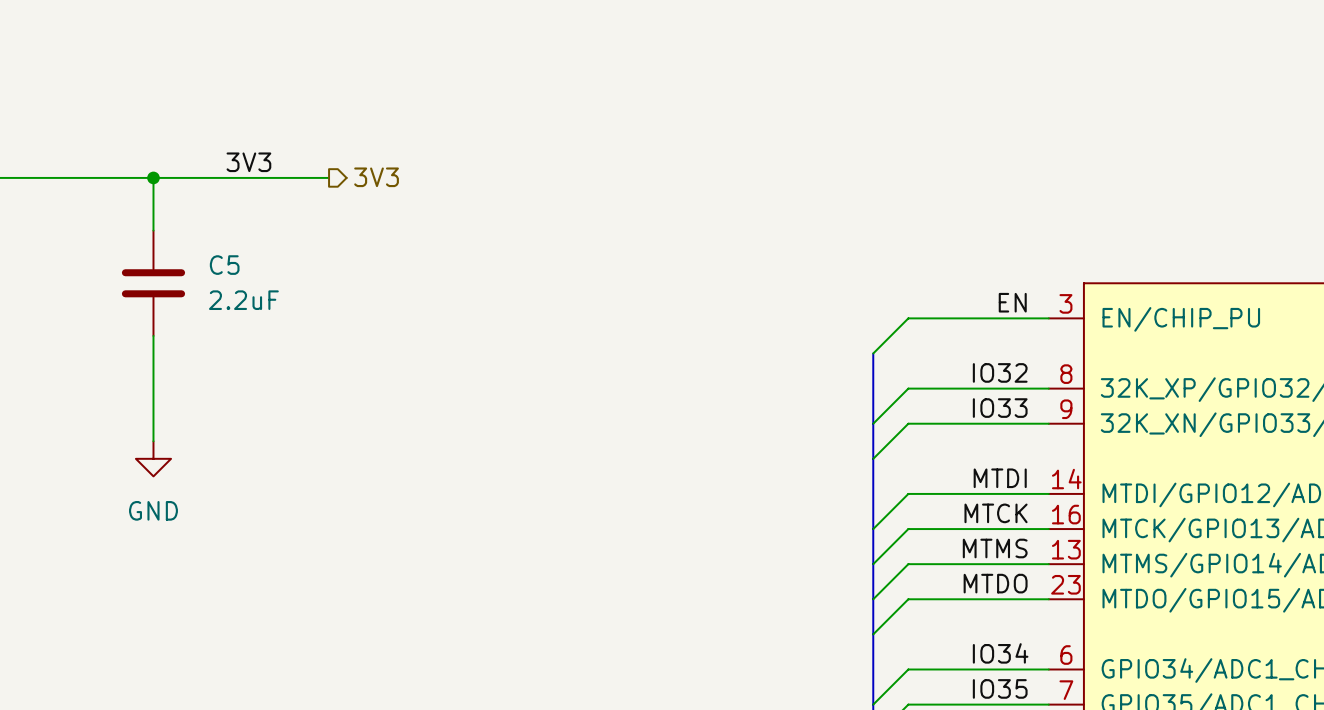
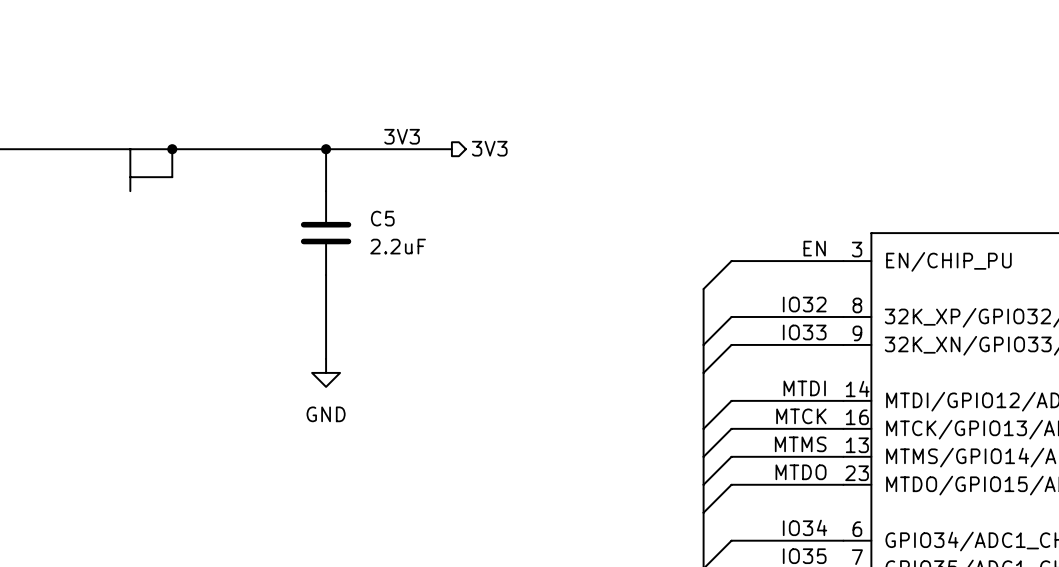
label position: 3V3 (248, 162) -> 3V3 (402, 136)
junction position: (153, 177) -> (172, 149)
wire: none -> (172, 149) (172, 177) (130, 177)
wire: none -> (270, 149) (451, 149)
hierarchical label position: 3V3 (376, 177) -> 3V3 (489, 148)
wire: none -> (326, 149) (326, 191)
junction: none -> (326, 149)
C5 position: (153, 283) -> (326, 233)
wire: (153, 335) (153, 441) -> (326, 275) (326, 358)
power symbol position: GND (153, 458) -> GND (326, 372)

